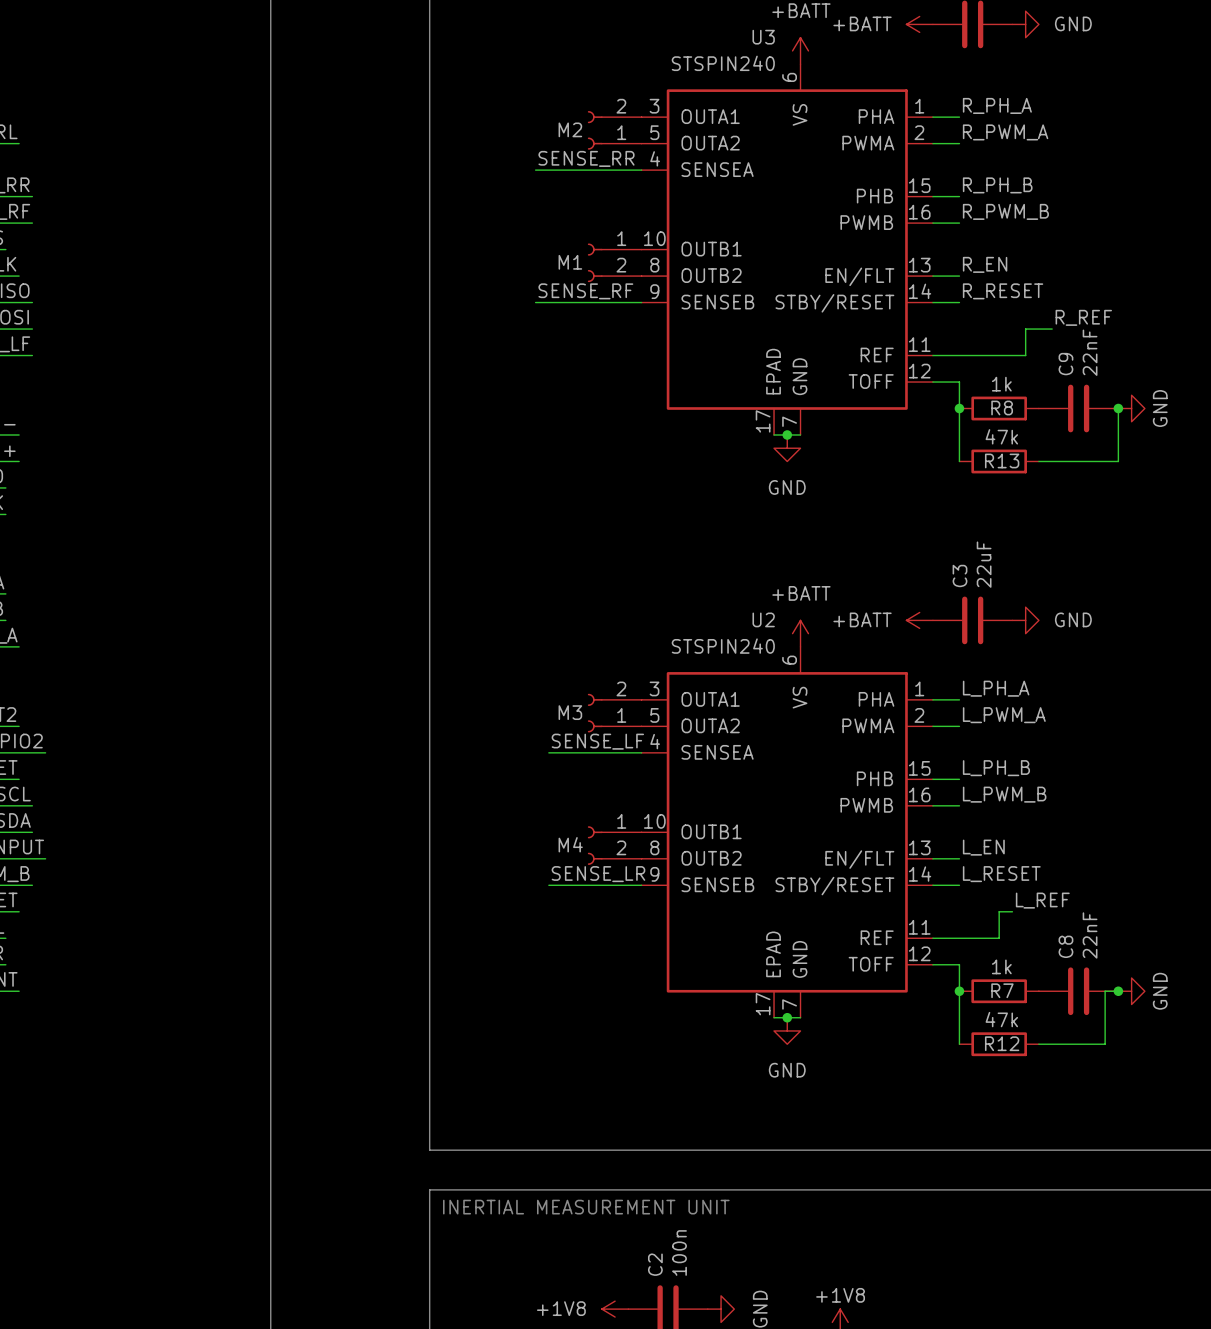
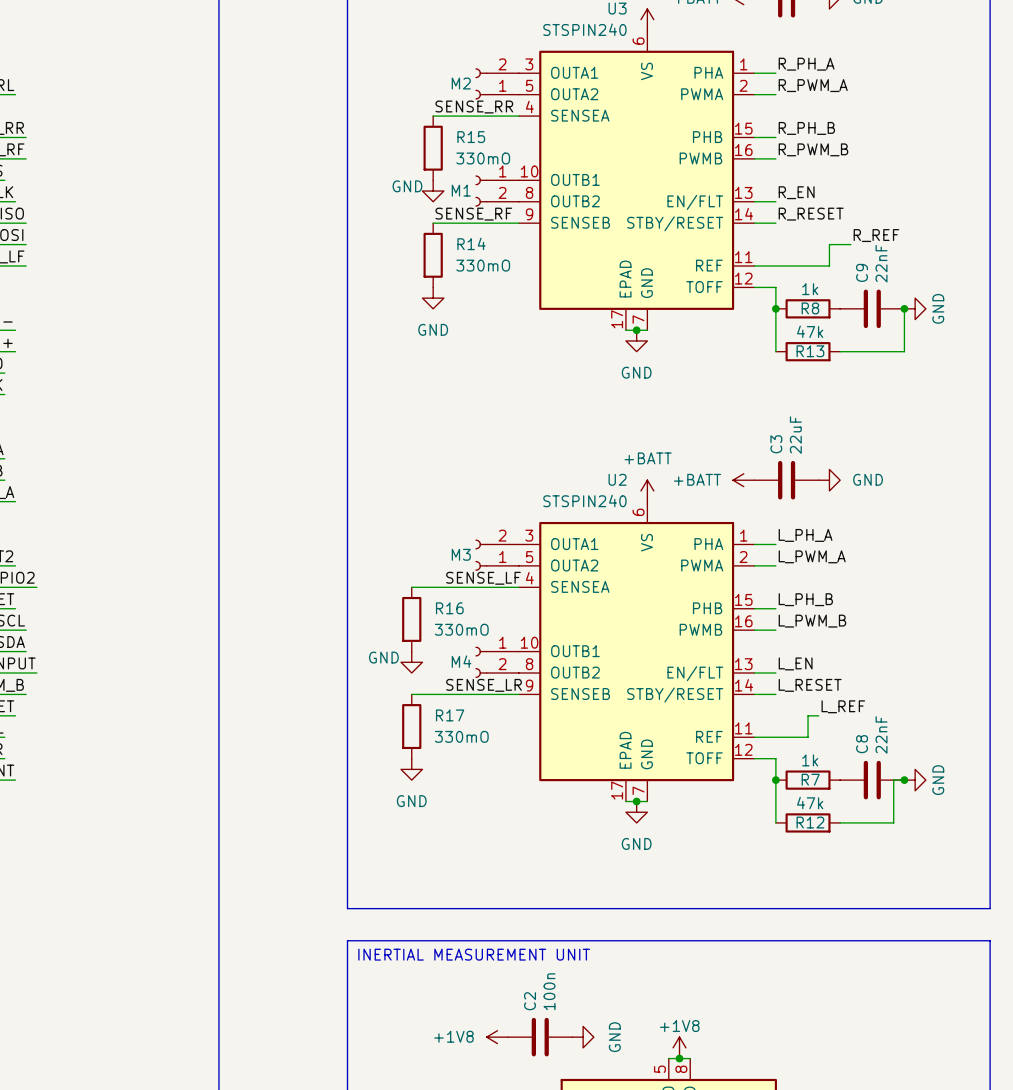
R15: none -> 330mO (433, 148)
power symbol: none -> GND (433, 191)
R14: none -> 330mO (433, 255)
power symbol: none -> GND (433, 298)
wire: none -> (411, 587) (443, 587)
R16: none -> 330mO (411, 619)
power symbol: none -> GND (411, 662)
wire: none -> (411, 694) (443, 694)
R17: none -> 330mO (411, 726)
power symbol: none -> GND (411, 769)

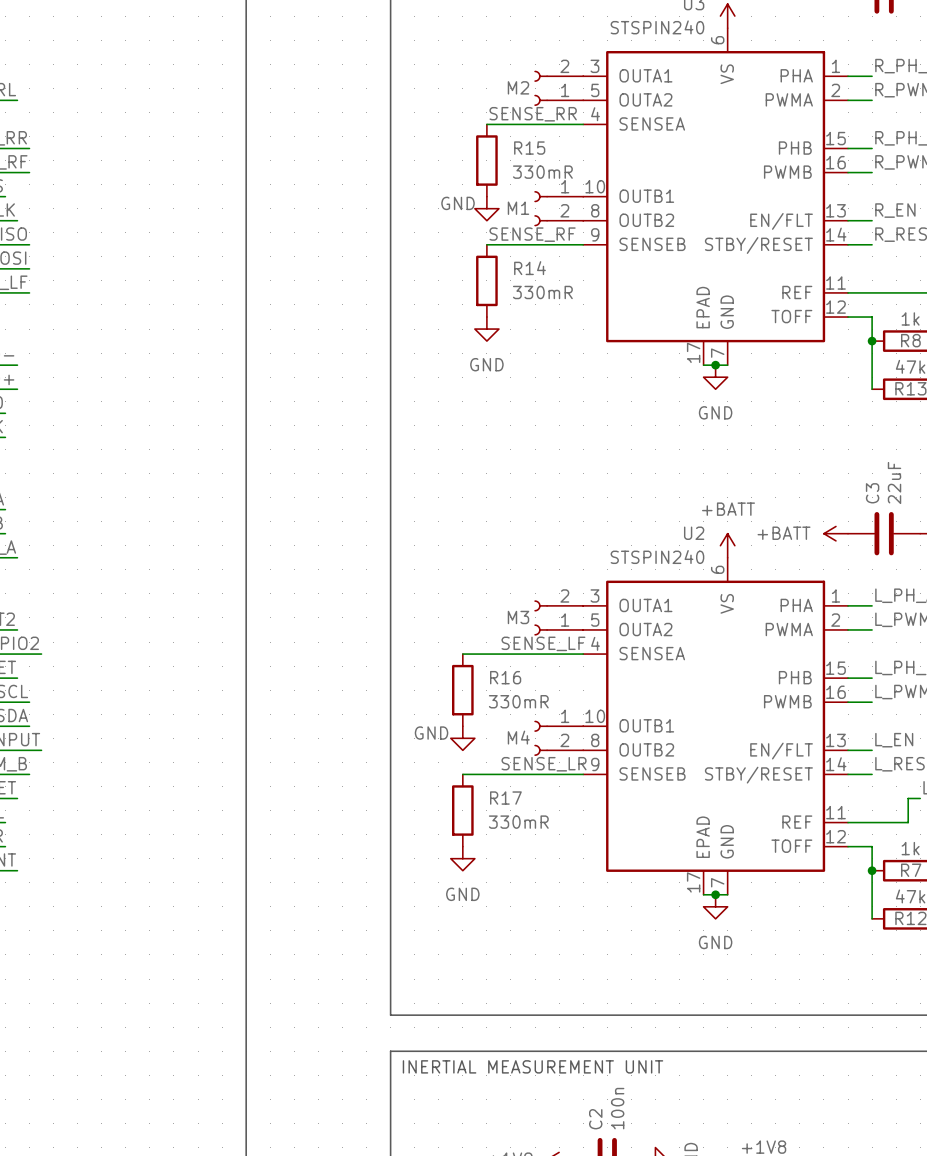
R15 value: 330mO (483, 158) -> 330mR (542, 172)
R14 value: 330mO (483, 265) -> 330mR (542, 292)
R16 value: 330mO (461, 629) -> 330mR (518, 701)
R17 value: 330mO (461, 736) -> 330mR (518, 822)

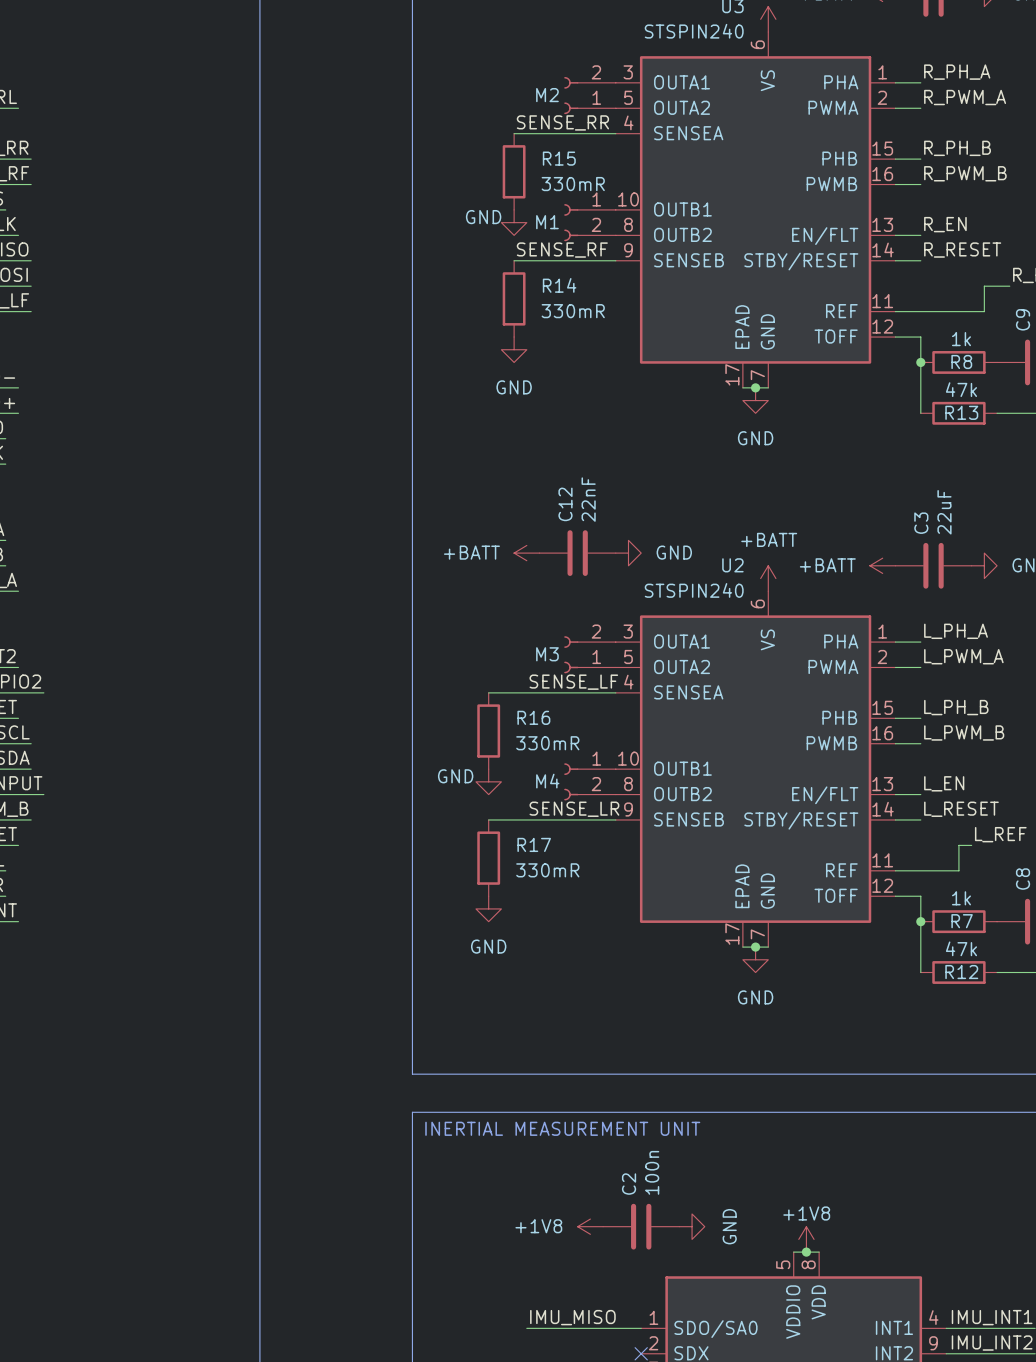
power symbol: none -> +BATT (526, 553)
C12: none -> 22nF (577, 553)
power symbol: none -> GND (628, 553)

